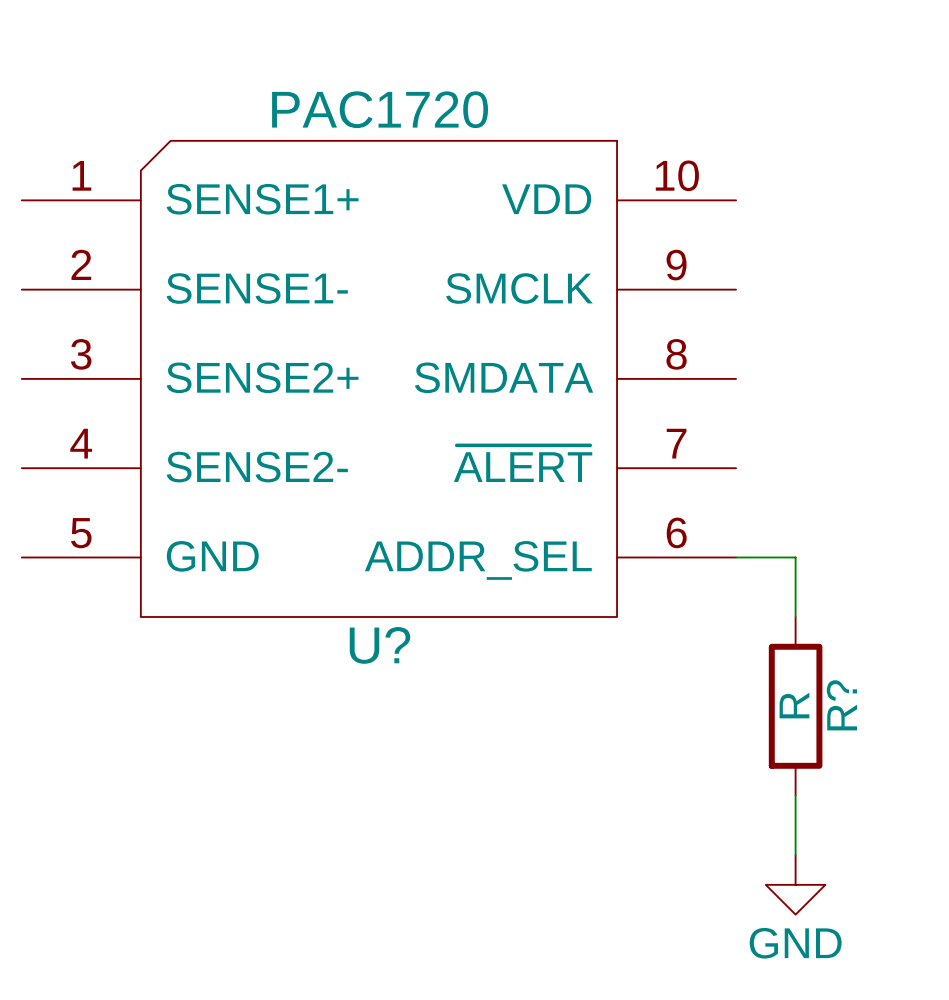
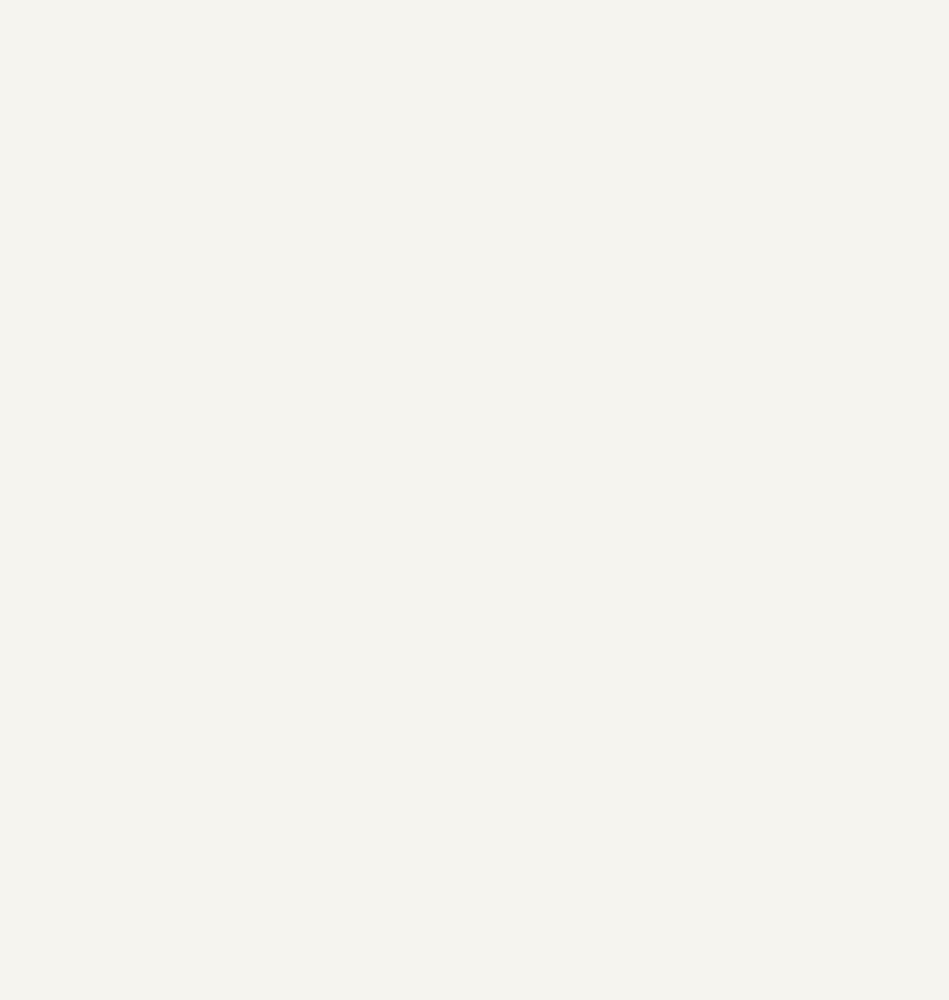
U?: PAC1720 (378, 378) -> none
wire: (736, 557) (795, 557) (795, 617) -> none
R?: R (795, 706) -> none
wire: (795, 795) (795, 855) -> none
power symbol: GND (795, 884) -> none

